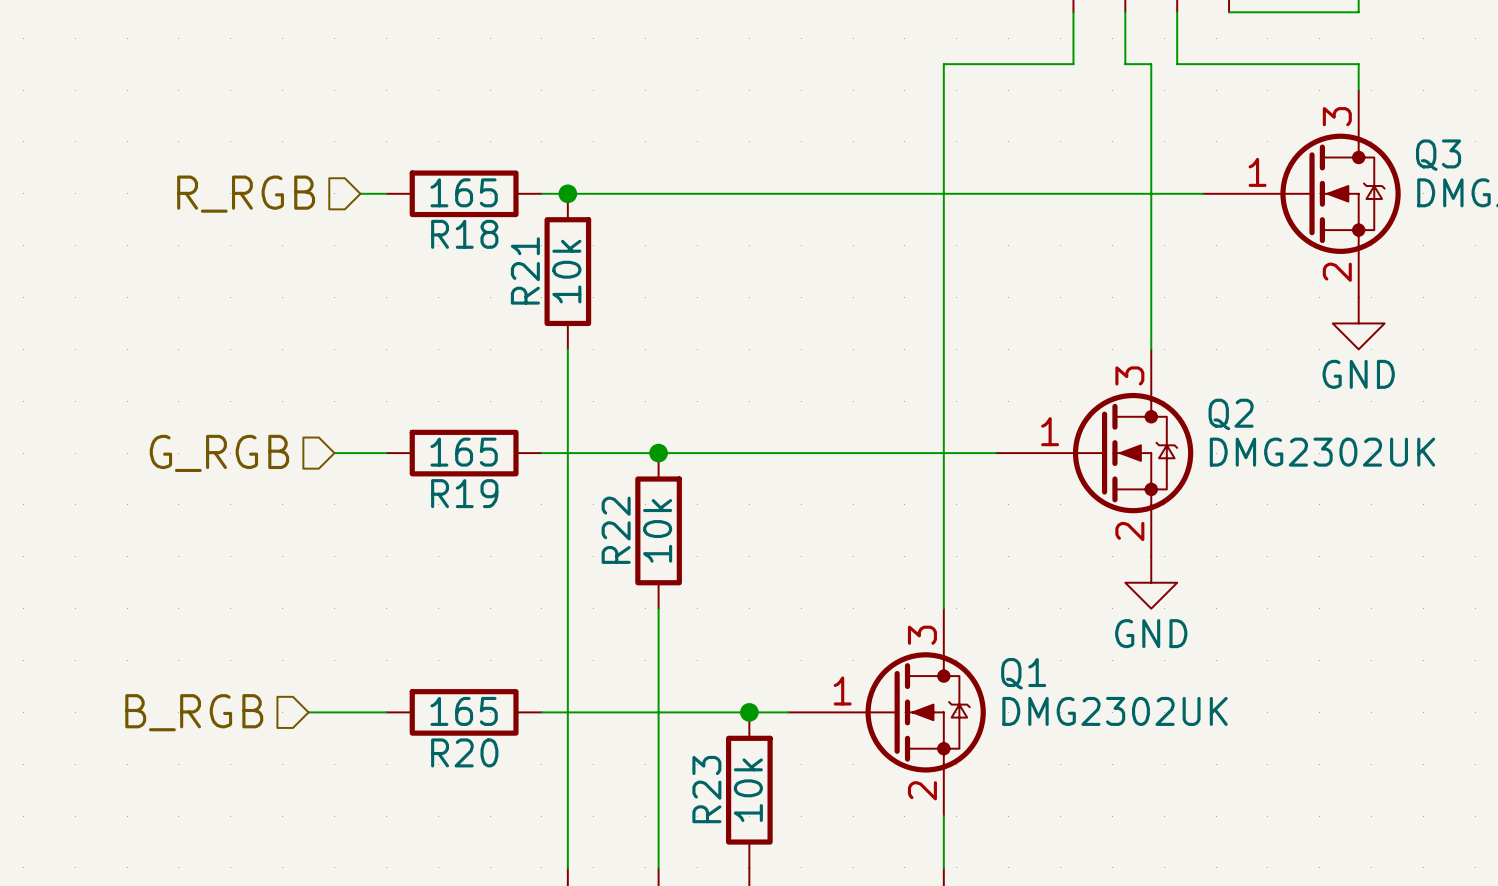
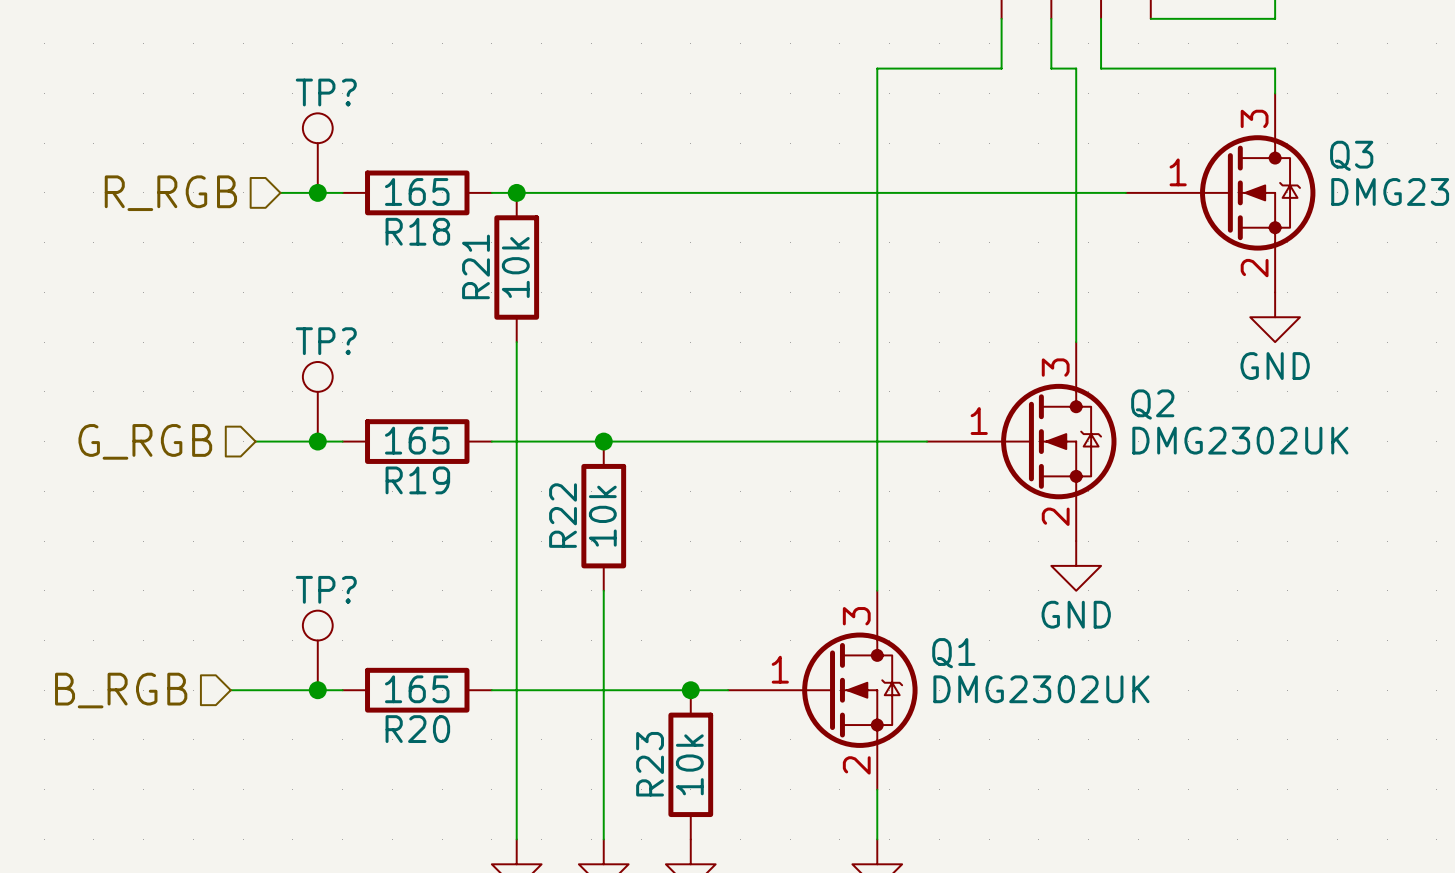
TP?: none -> (317, 153)
wire: none -> (280, 192) (317, 192)
junction: none -> (317, 192)
hierarchical label position: R_RGB (246, 194) -> R_RGB (170, 193)
TP?: none -> (317, 401)
hierarchical label position: G_RGB (219, 453) -> G_RGB (145, 441)
wire: none -> (255, 441) (292, 441)
junction: none -> (317, 441)
TP?: none -> (317, 650)
hierarchical label position: B_RGB (194, 712) -> B_RGB (121, 690)
wire: none -> (230, 690) (268, 690)
junction: none -> (317, 690)

